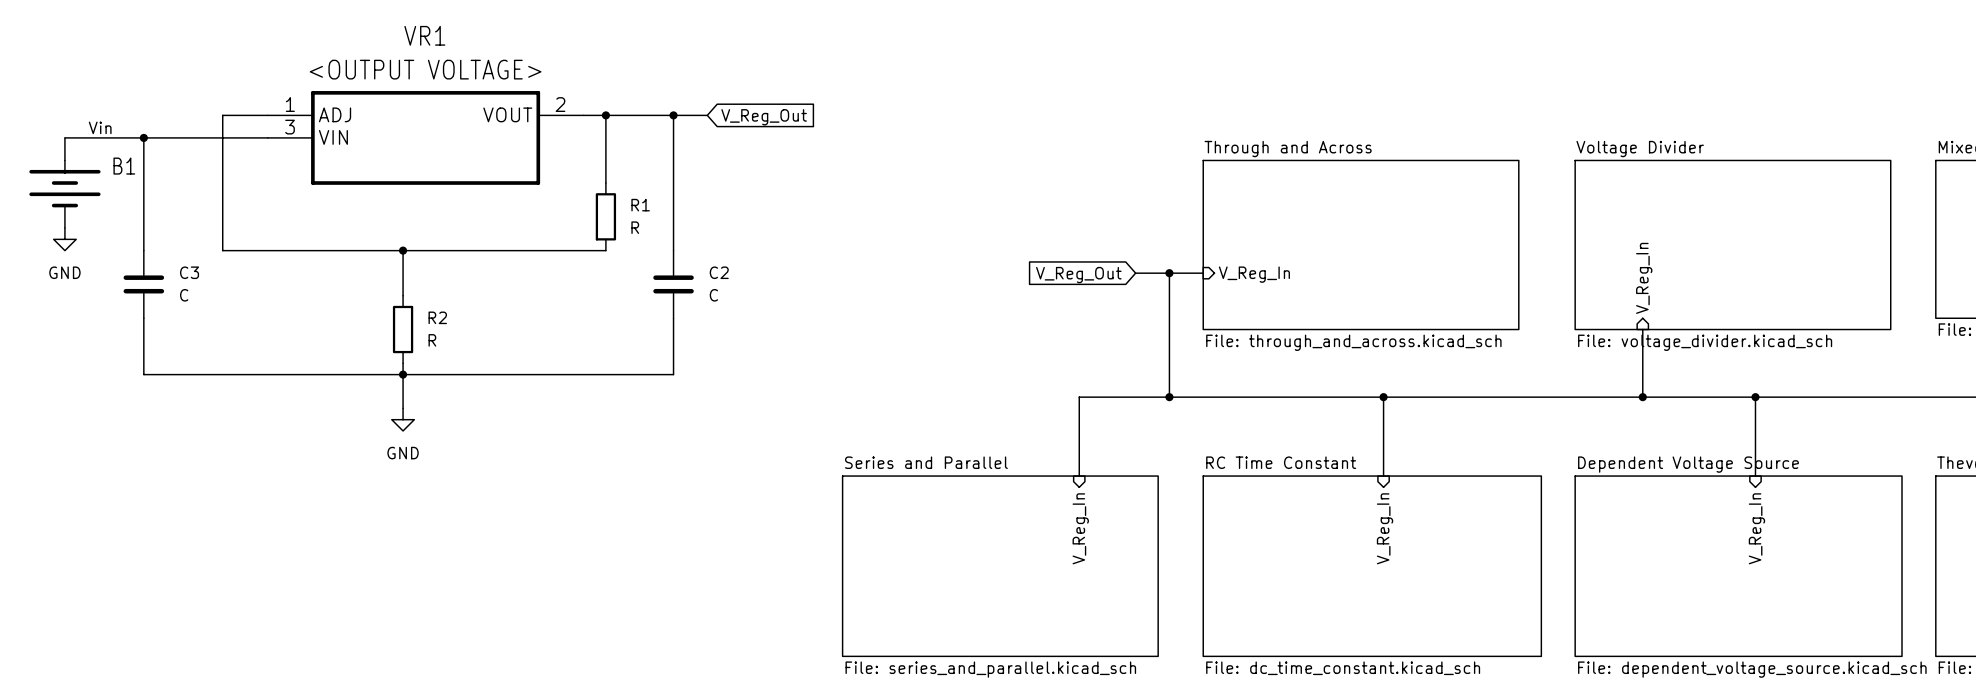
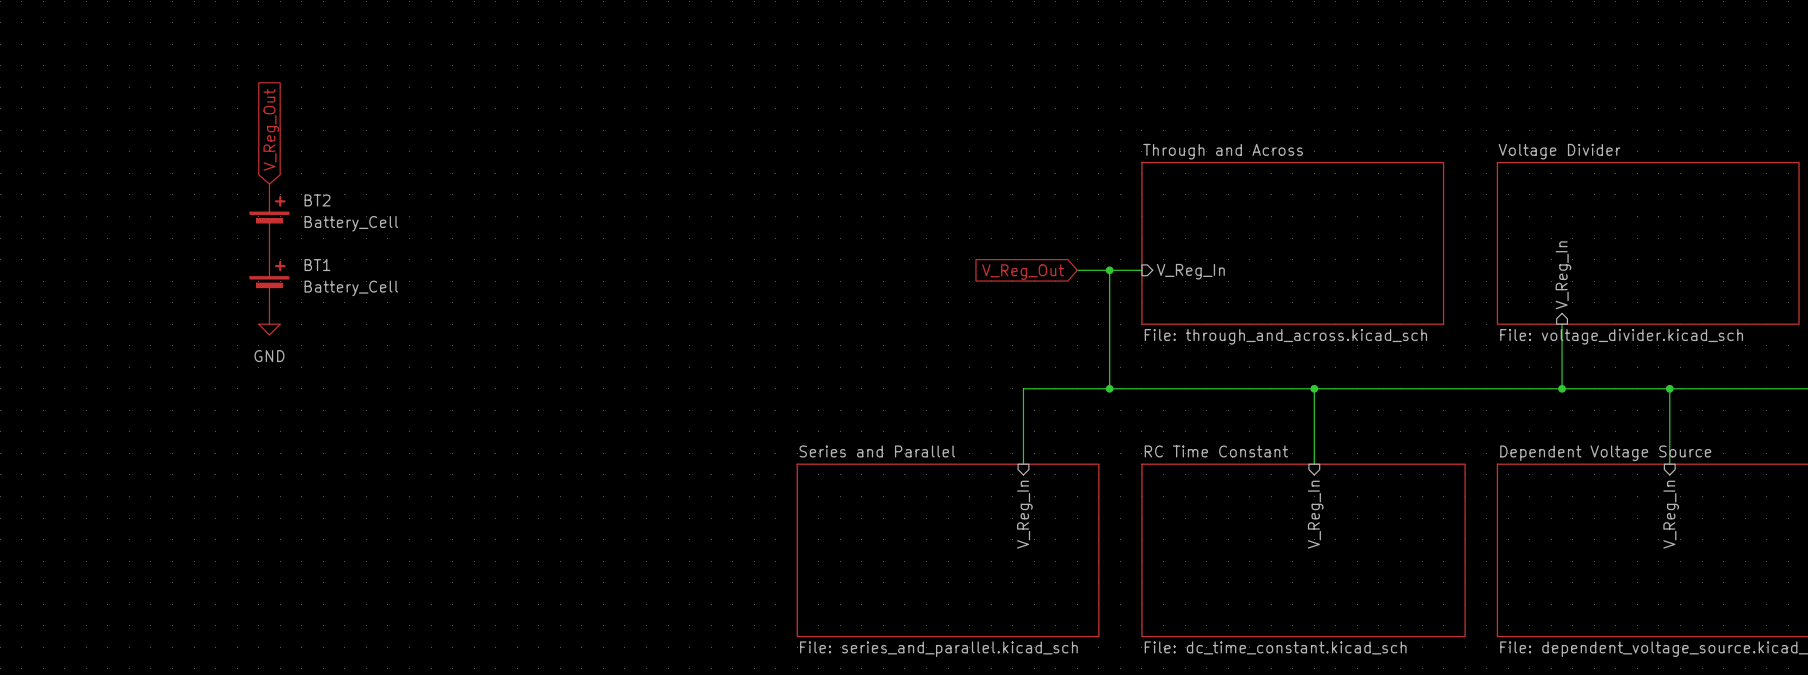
wire: (267, 115) (222, 115) (222, 250) (605, 250) -> none
wire: (583, 115) (707, 115) -> none
wire: (605, 115) (605, 183) -> none
junction: (605, 115) -> none
wire: (673, 115) (673, 250) -> none
junction: (673, 115) -> none
global label: V_Reg_Out (764, 117) -> none
global label: none -> V_Reg_Out (271, 129)
label: Vin (100, 127) -> none
wire: (64, 137) (267, 137) -> none
wire: (143, 137) (143, 250) -> none
junction: (143, 137) -> none
VR1: <OUTPUT VOLTAGE> (425, 137) -> none
B1: (64, 183) -> none
BT2: none -> Battery_Cell (269, 216)
R1: R (605, 216) -> none
power symbol: GND (64, 239) -> none
wire: (403, 250) (403, 295) -> none
junction: (403, 250) -> none
C3: C (143, 284) -> none
BT1: none -> Battery_Cell (269, 281)
C2: C (673, 284) -> none
wire: (143, 318) (143, 374) (673, 374) (673, 318) -> none
power symbol: none -> GND (269, 324)
R2: R (403, 329) -> none
wire: (403, 363) (403, 408) -> none
junction: (403, 374) -> none
power symbol: GND (403, 419) -> none

